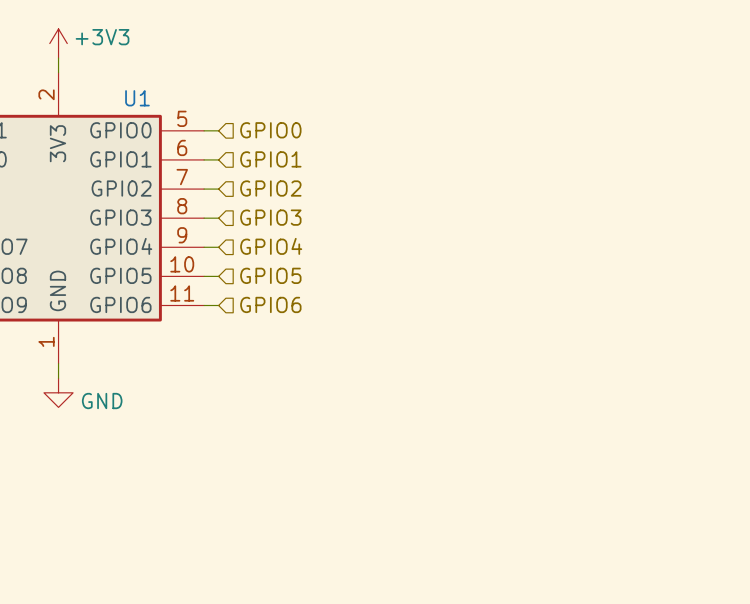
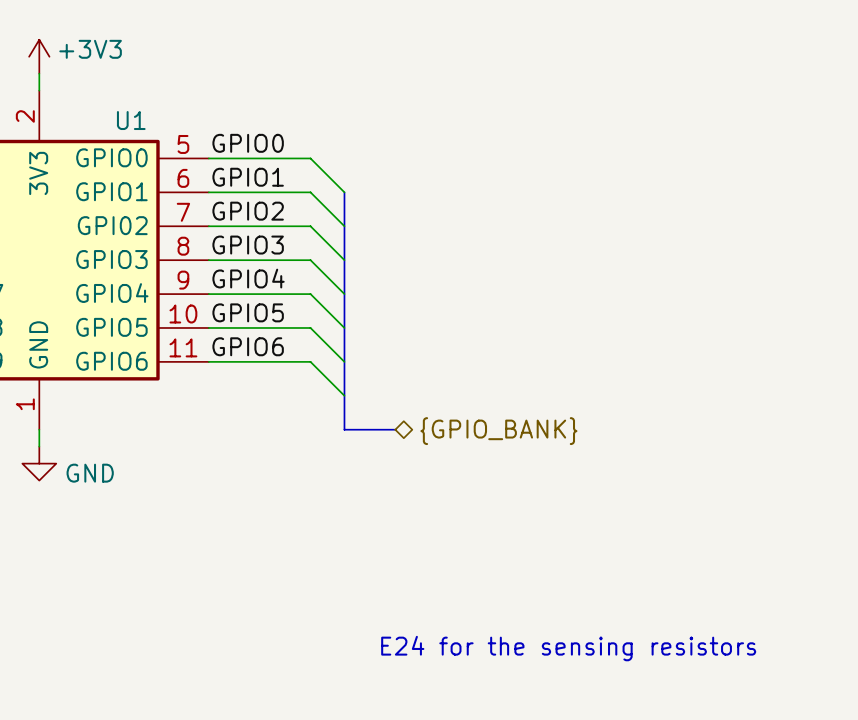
label: none -> GPIO0 (248, 143)
wire: none -> (225, 158) (310, 158) (344, 192)
hierarchical label: GPIO0 (270, 130) -> none
label: none -> GPIO1 (248, 177)
wire: none -> (225, 192) (310, 192) (344, 226)
hierarchical label: GPIO1 (270, 159) -> none
bus: none -> (344, 192) (344, 429) (395, 429)
label: none -> GPIO2 (248, 211)
hierarchical label: GPIO2 (270, 188) -> none
wire: none -> (225, 226) (310, 226) (344, 260)
label: none -> GPIO3 (248, 245)
hierarchical label: GPIO3 (270, 217) -> none
wire: none -> (225, 260) (310, 260) (344, 294)
label: none -> GPIO4 (248, 278)
hierarchical label: GPIO4 (271, 246) -> none
wire: none -> (225, 294) (310, 294) (344, 327)
label: none -> GPIO5 (248, 312)
hierarchical label: GPIO5 (270, 275) -> none
wire: none -> (225, 327) (310, 327) (344, 361)
label: none -> GPIO6 (248, 346)
hierarchical label: GPIO6 (270, 304) -> none
wire: none -> (225, 361) (310, 361) (344, 395)
hierarchical label: none -> {GPIO_BANK} (498, 431)
text: none -> E24 for the sensing resistors (568, 648)

